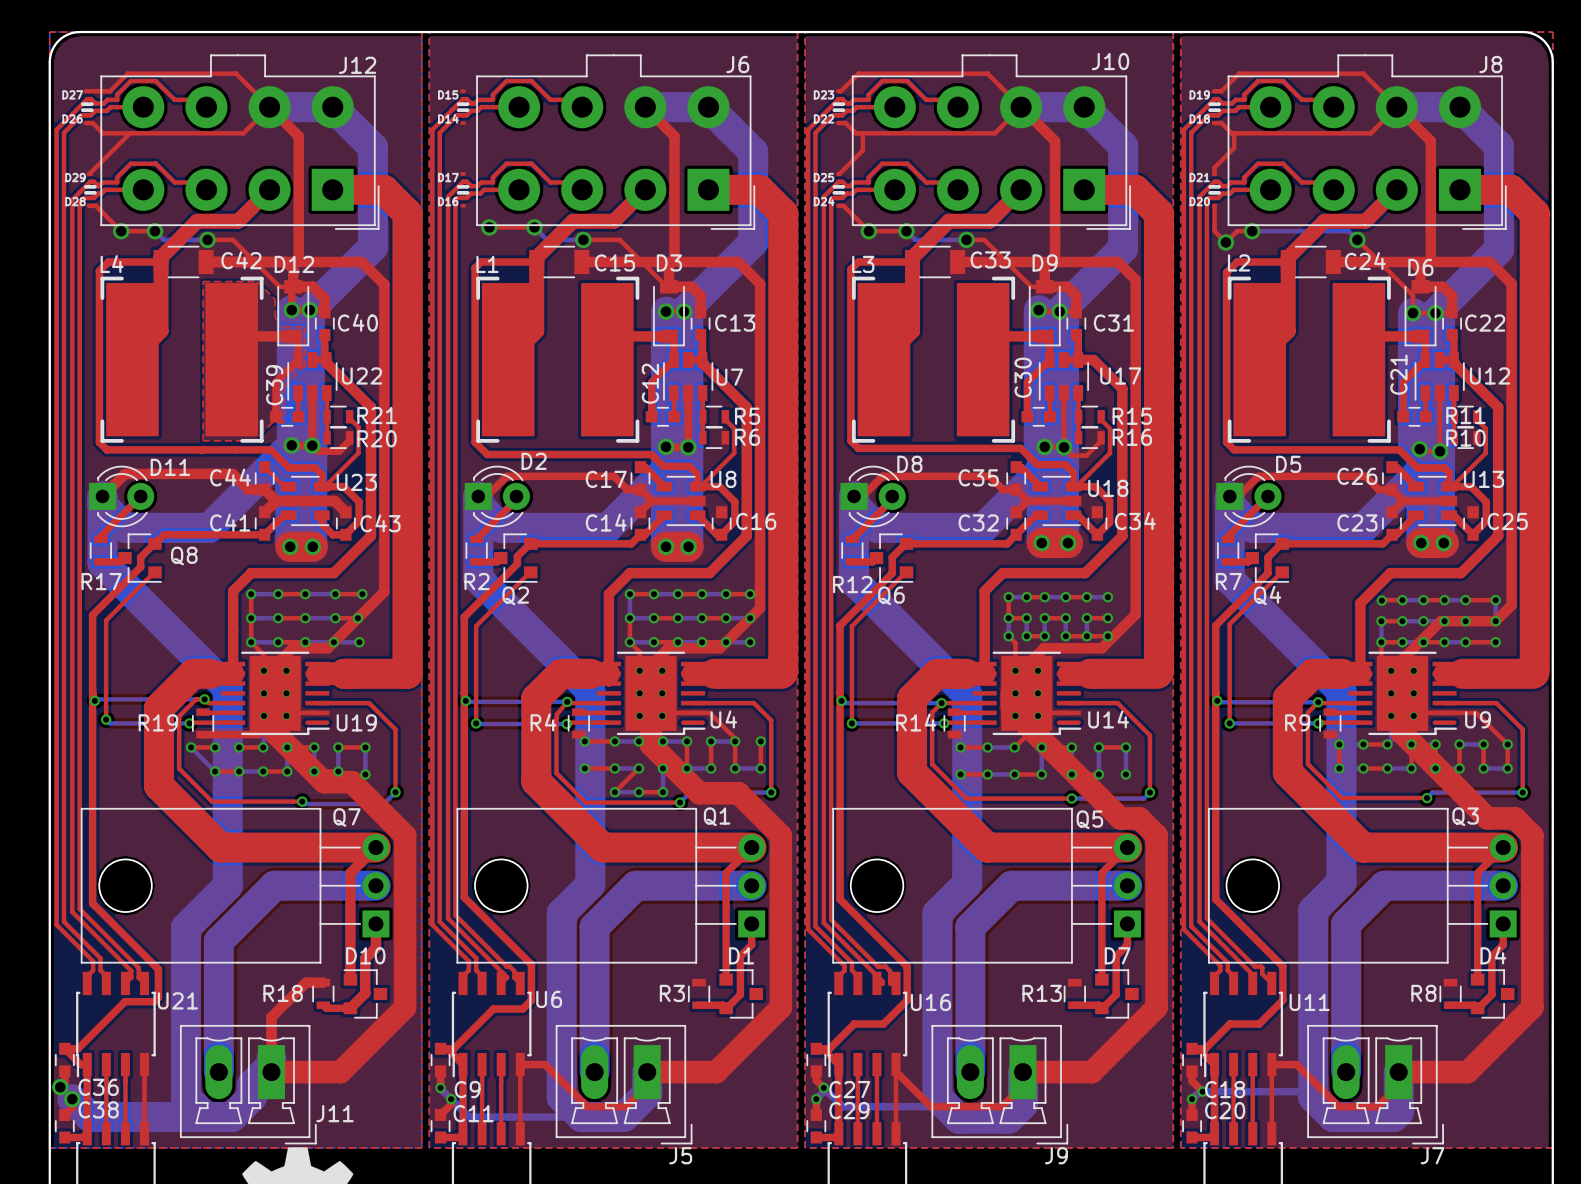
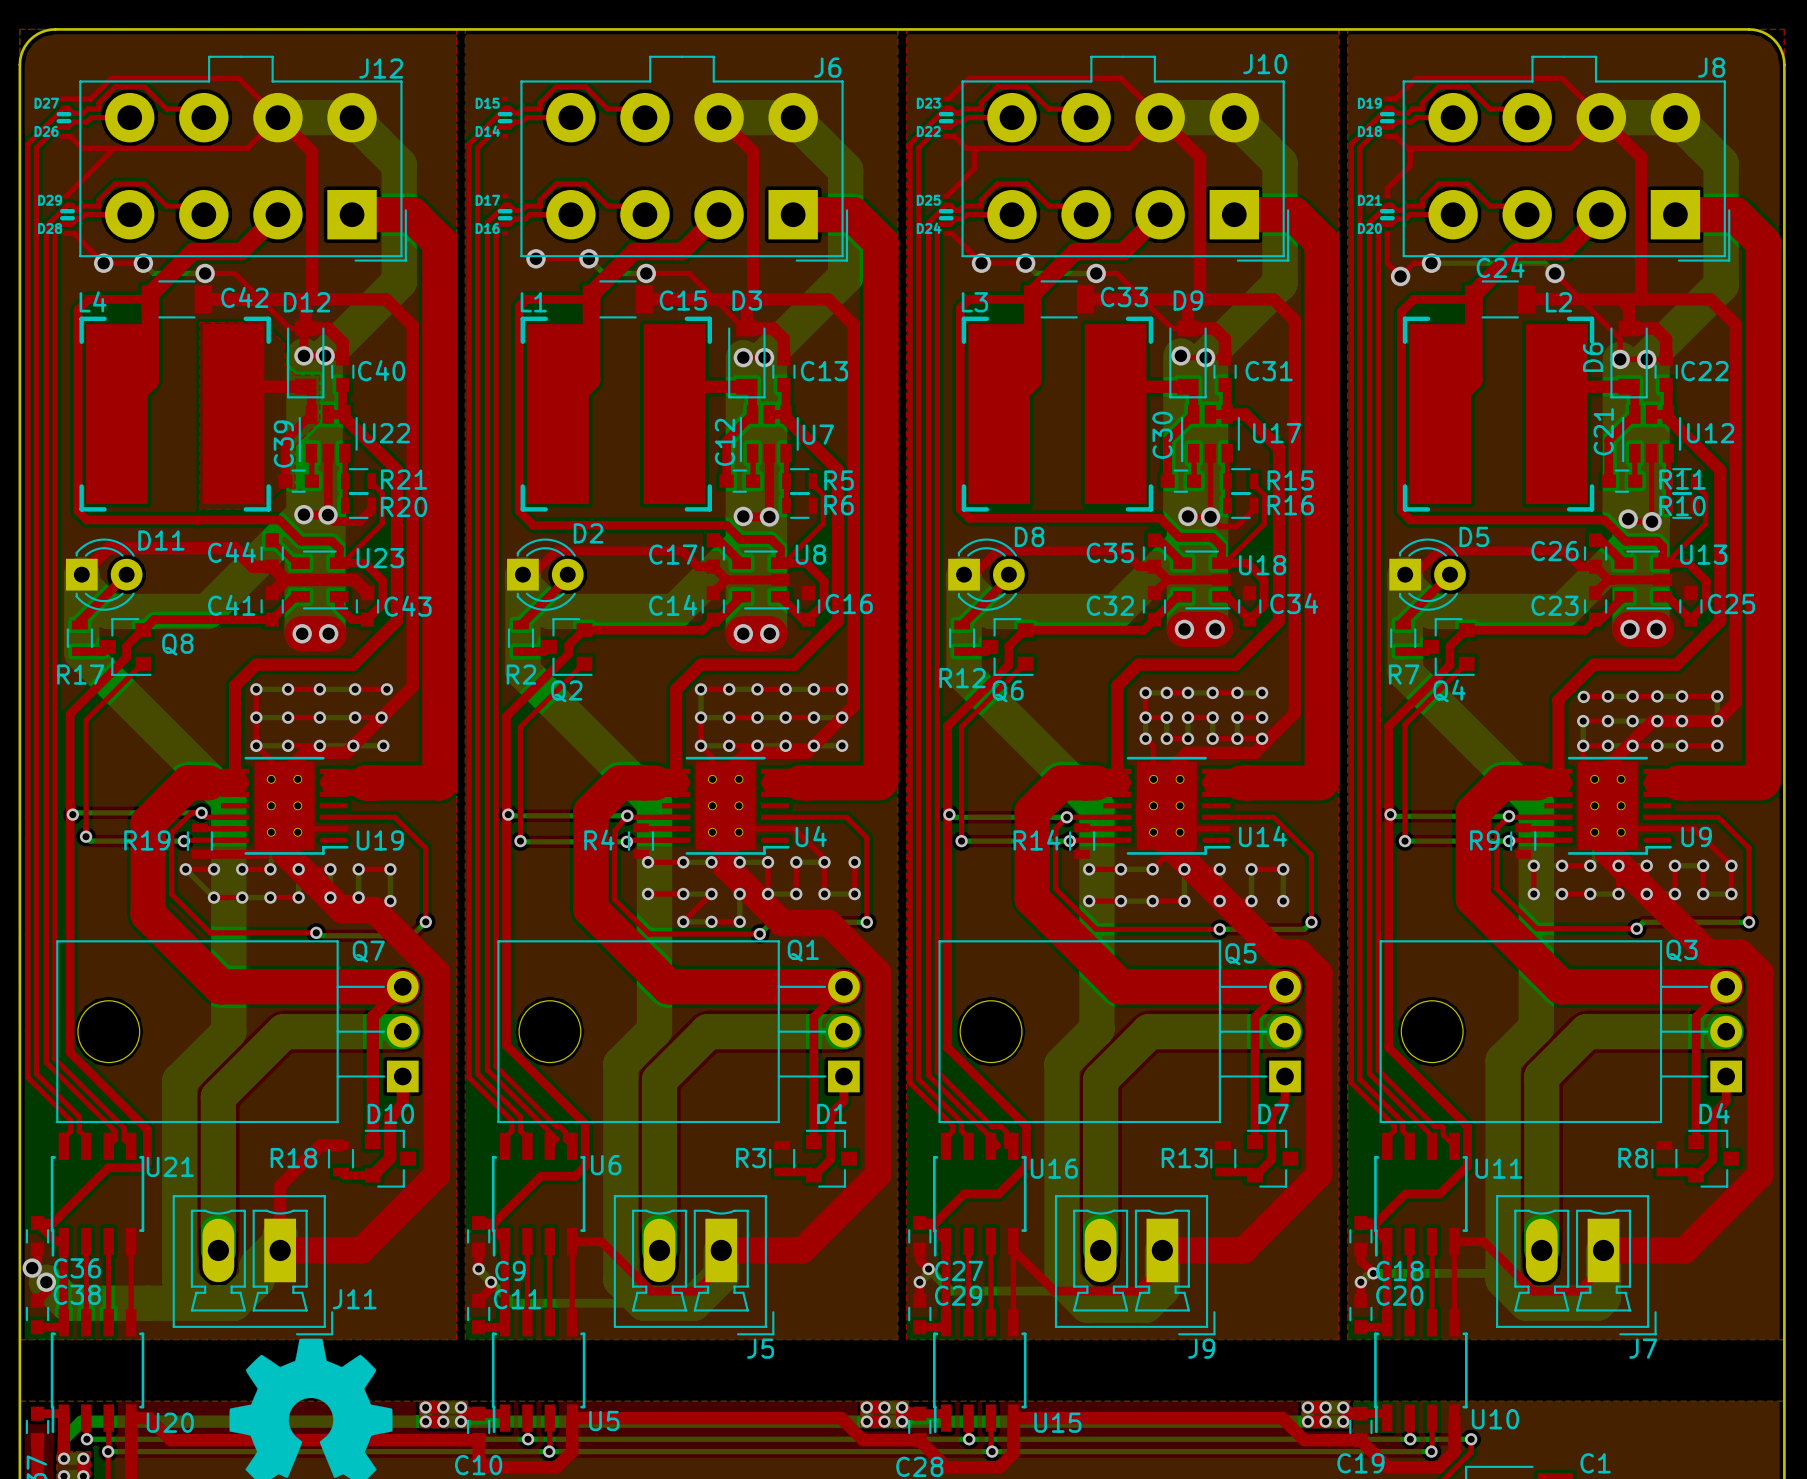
C24 name position: C24 (1365, 261) -> C24 (1500, 267)
L2 name position: L2 (1239, 262) -> L2 (1558, 302)
D6 name rotation: 0° (1420, 267) -> 90° counterclockwise (1593, 357)
D6 name position: D6 (1420, 267) -> D6 (1593, 357)

